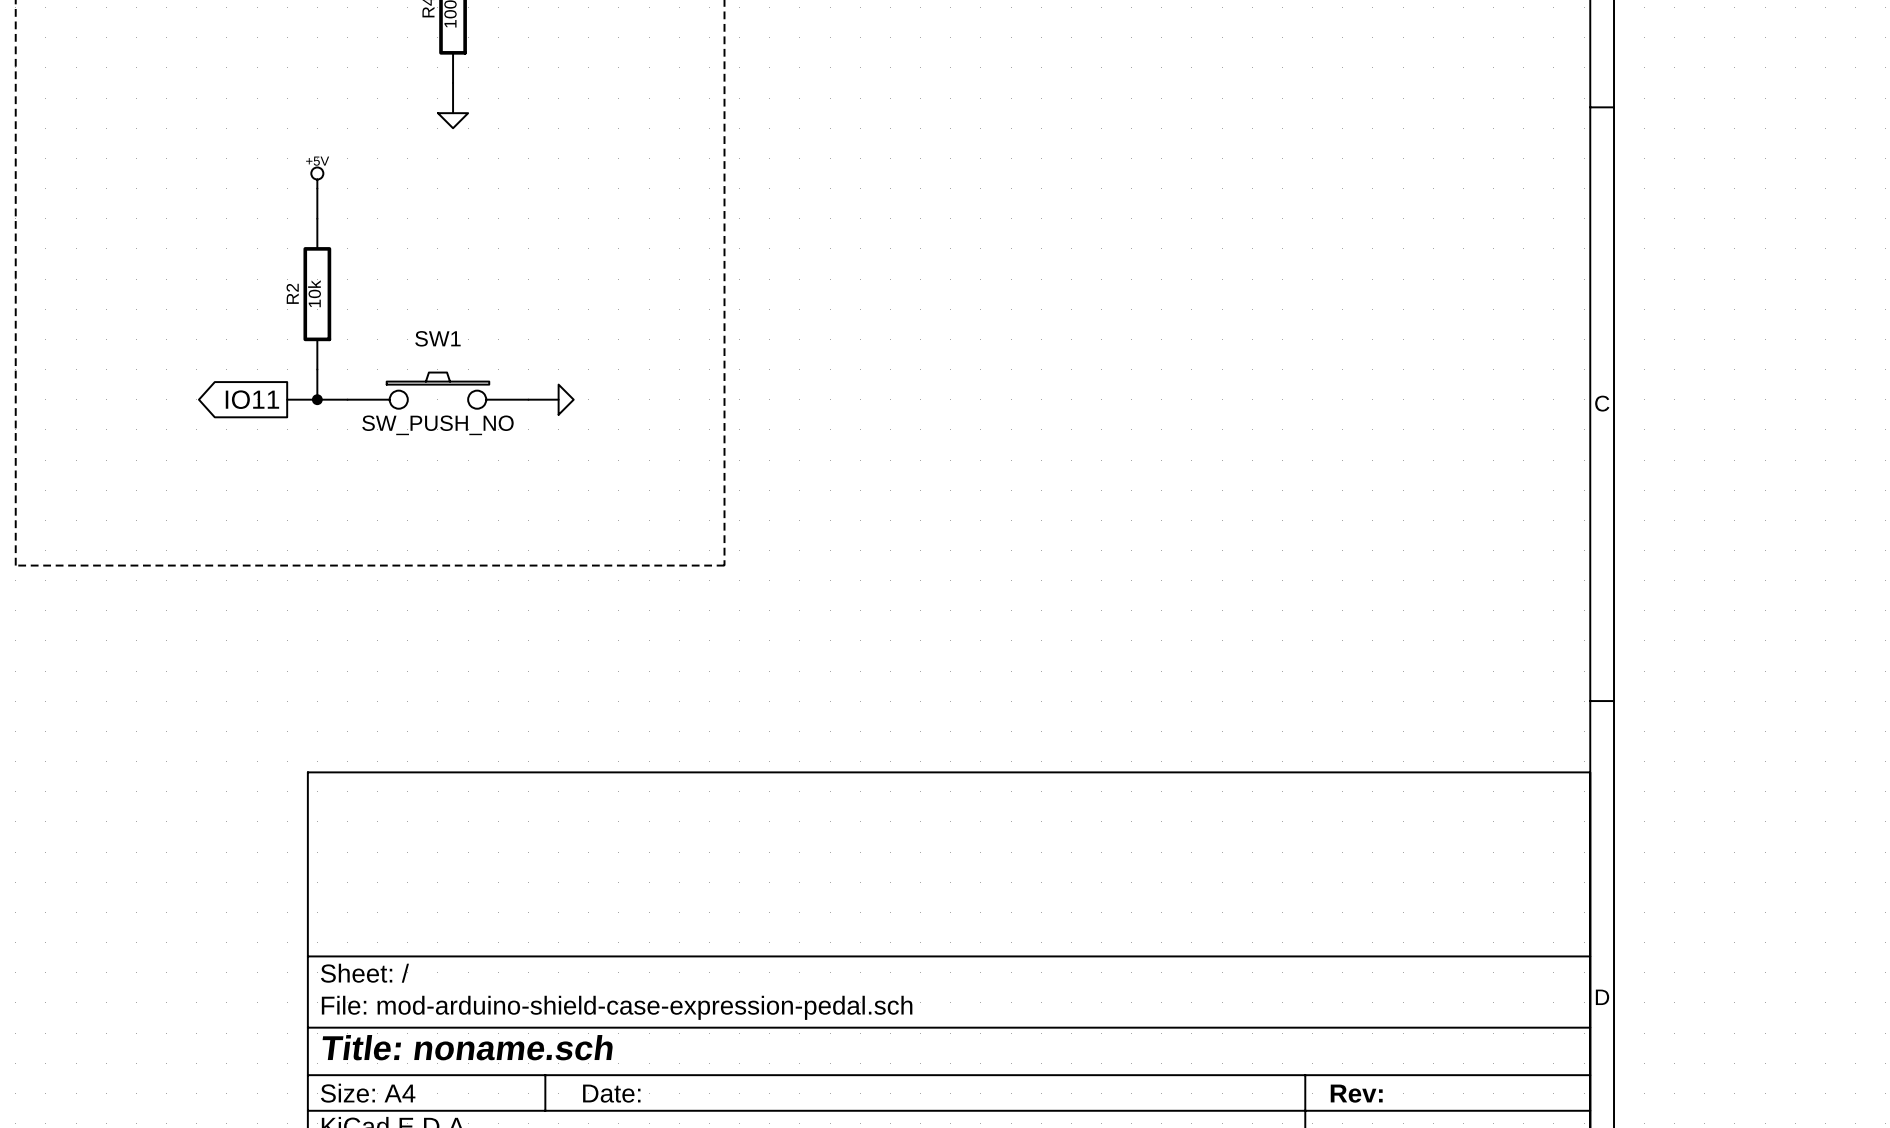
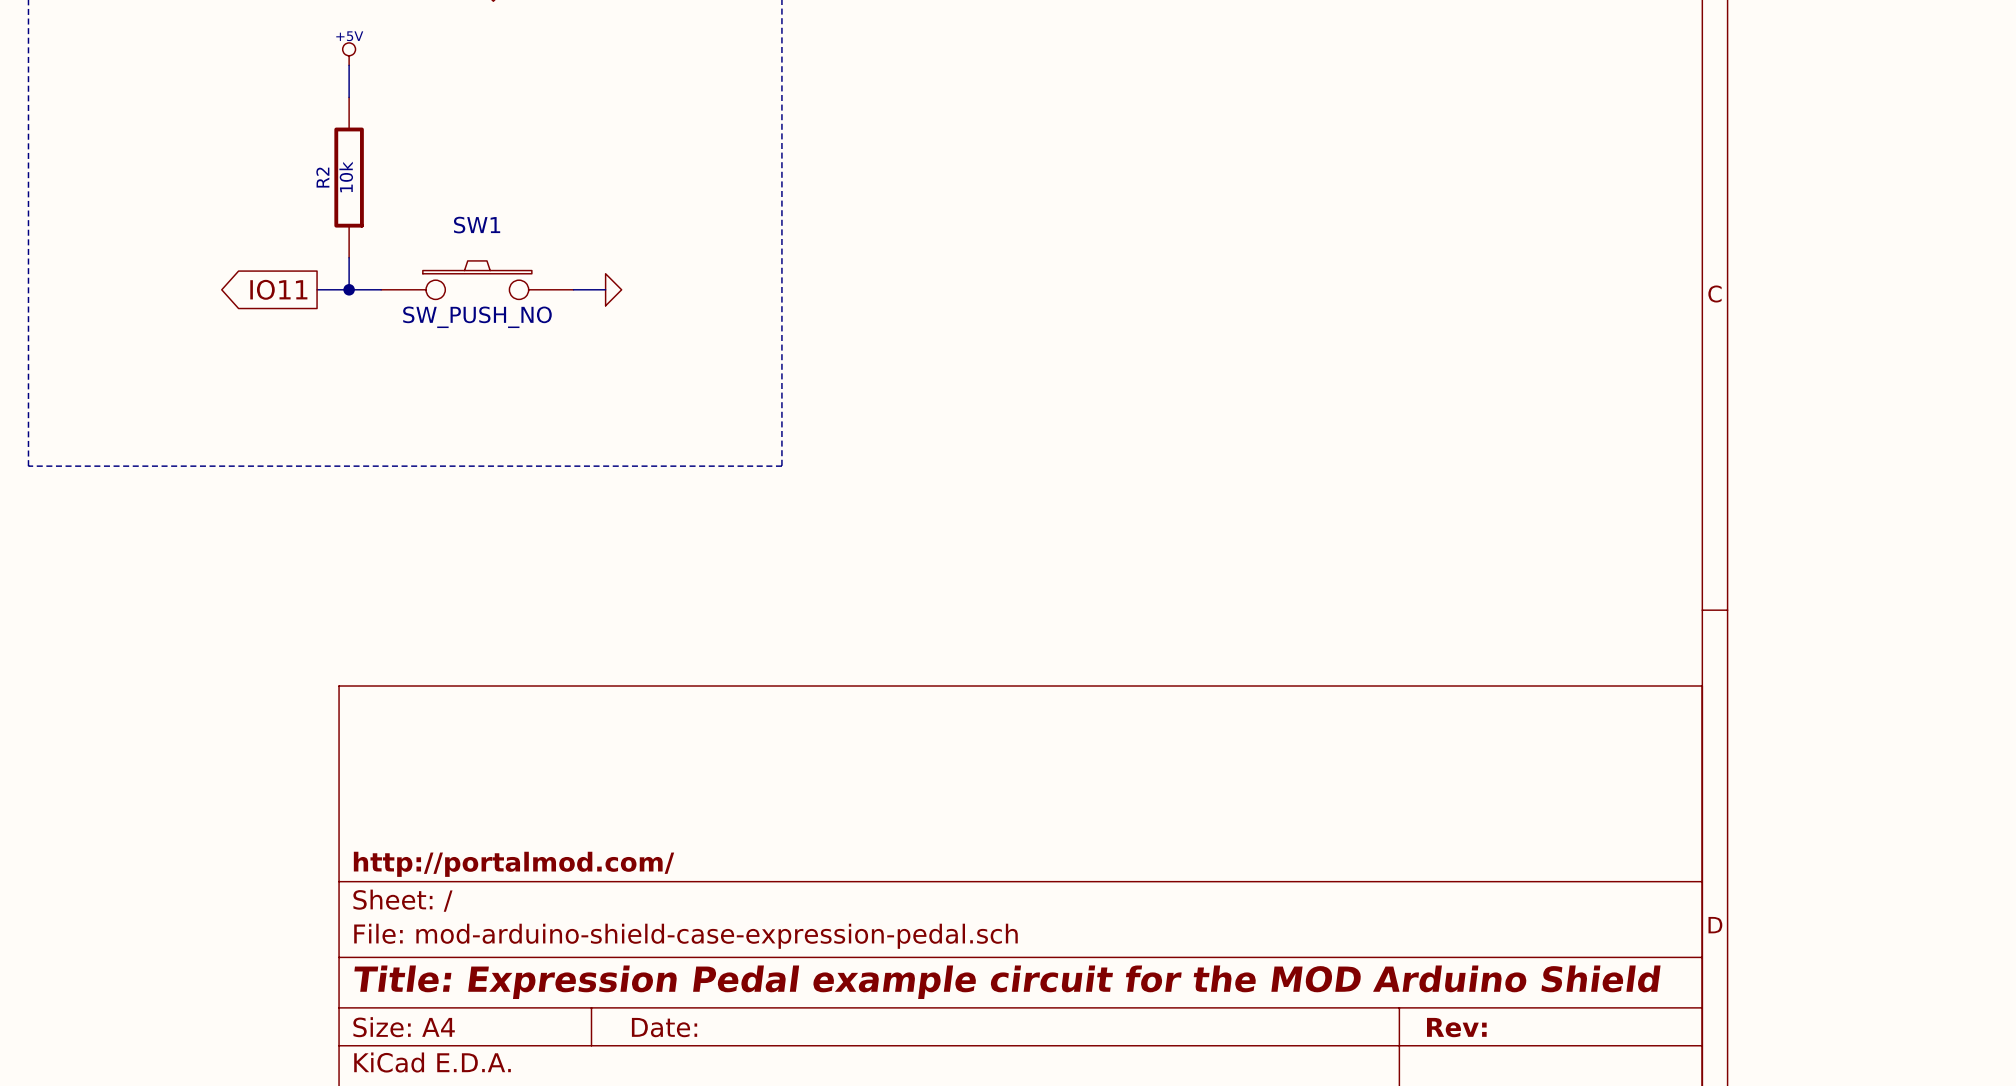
title block: none -> http://portalmod.com/ (514, 864)
title block: Title: noname.sch (467, 1047) -> Title: Expression Pedal example circuit for the MOD Arduino Shield (1007, 982)

